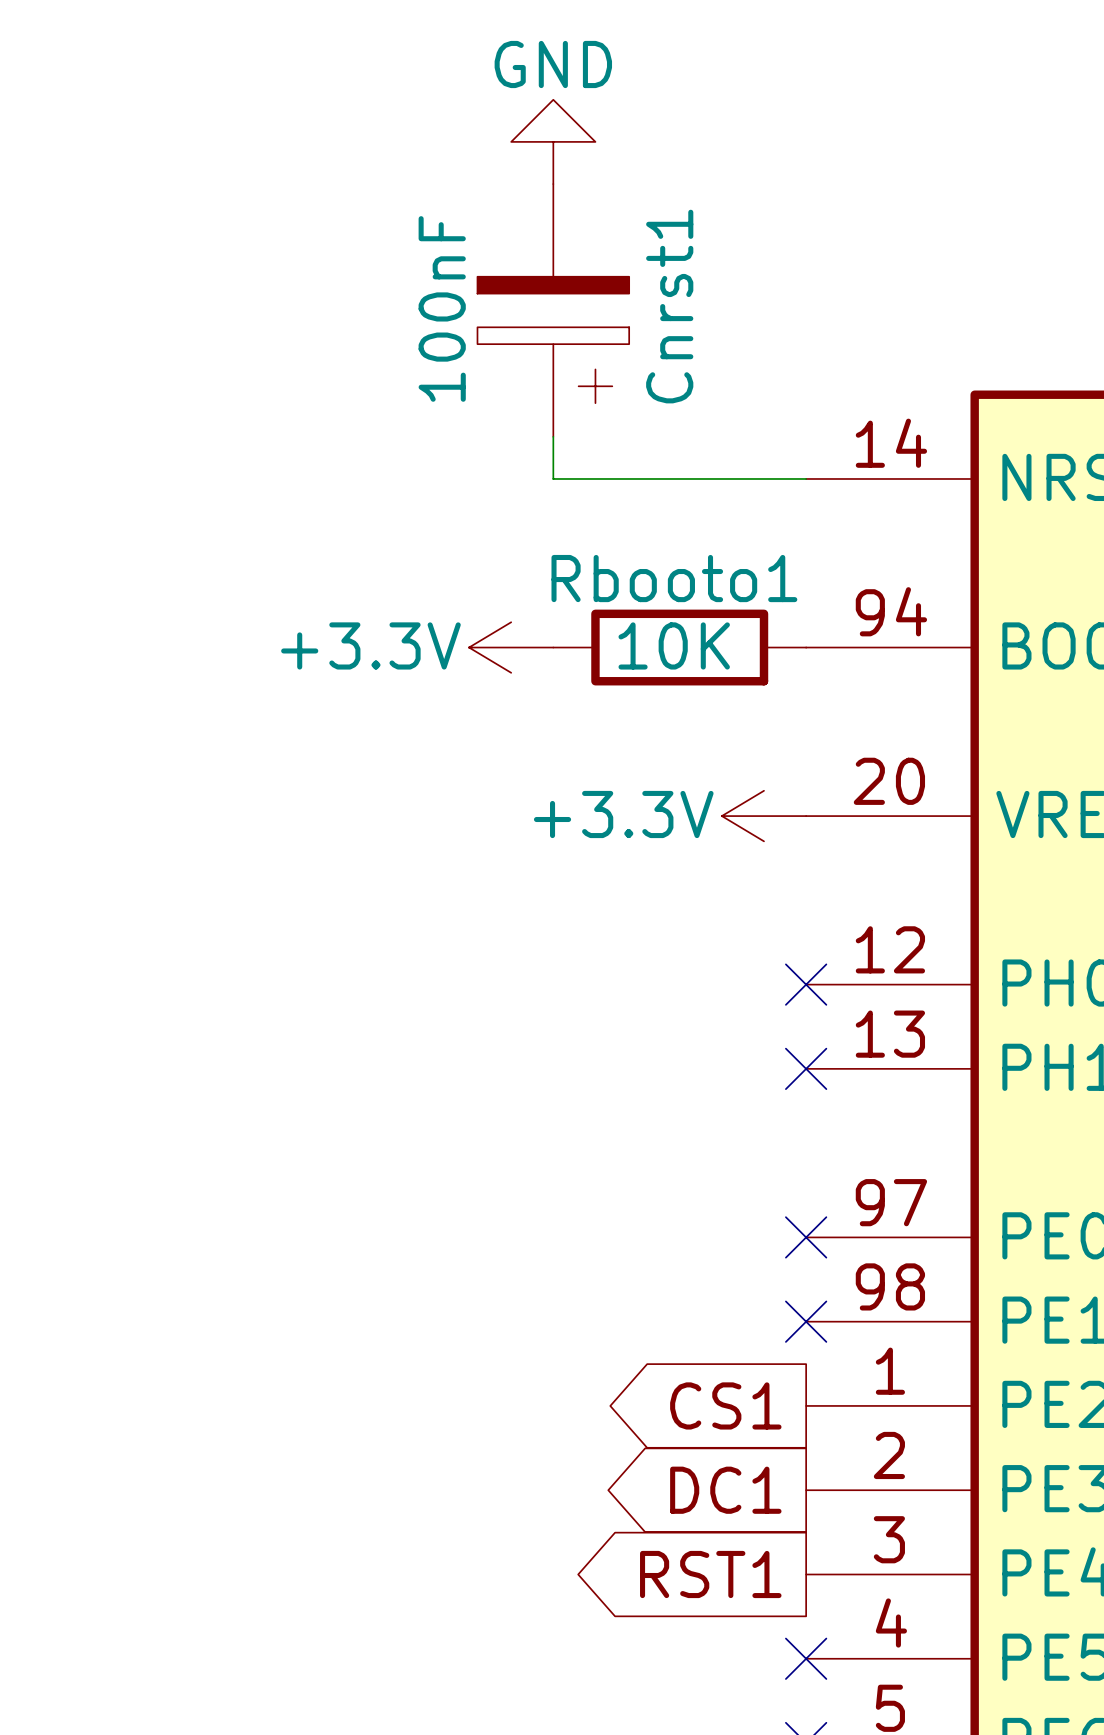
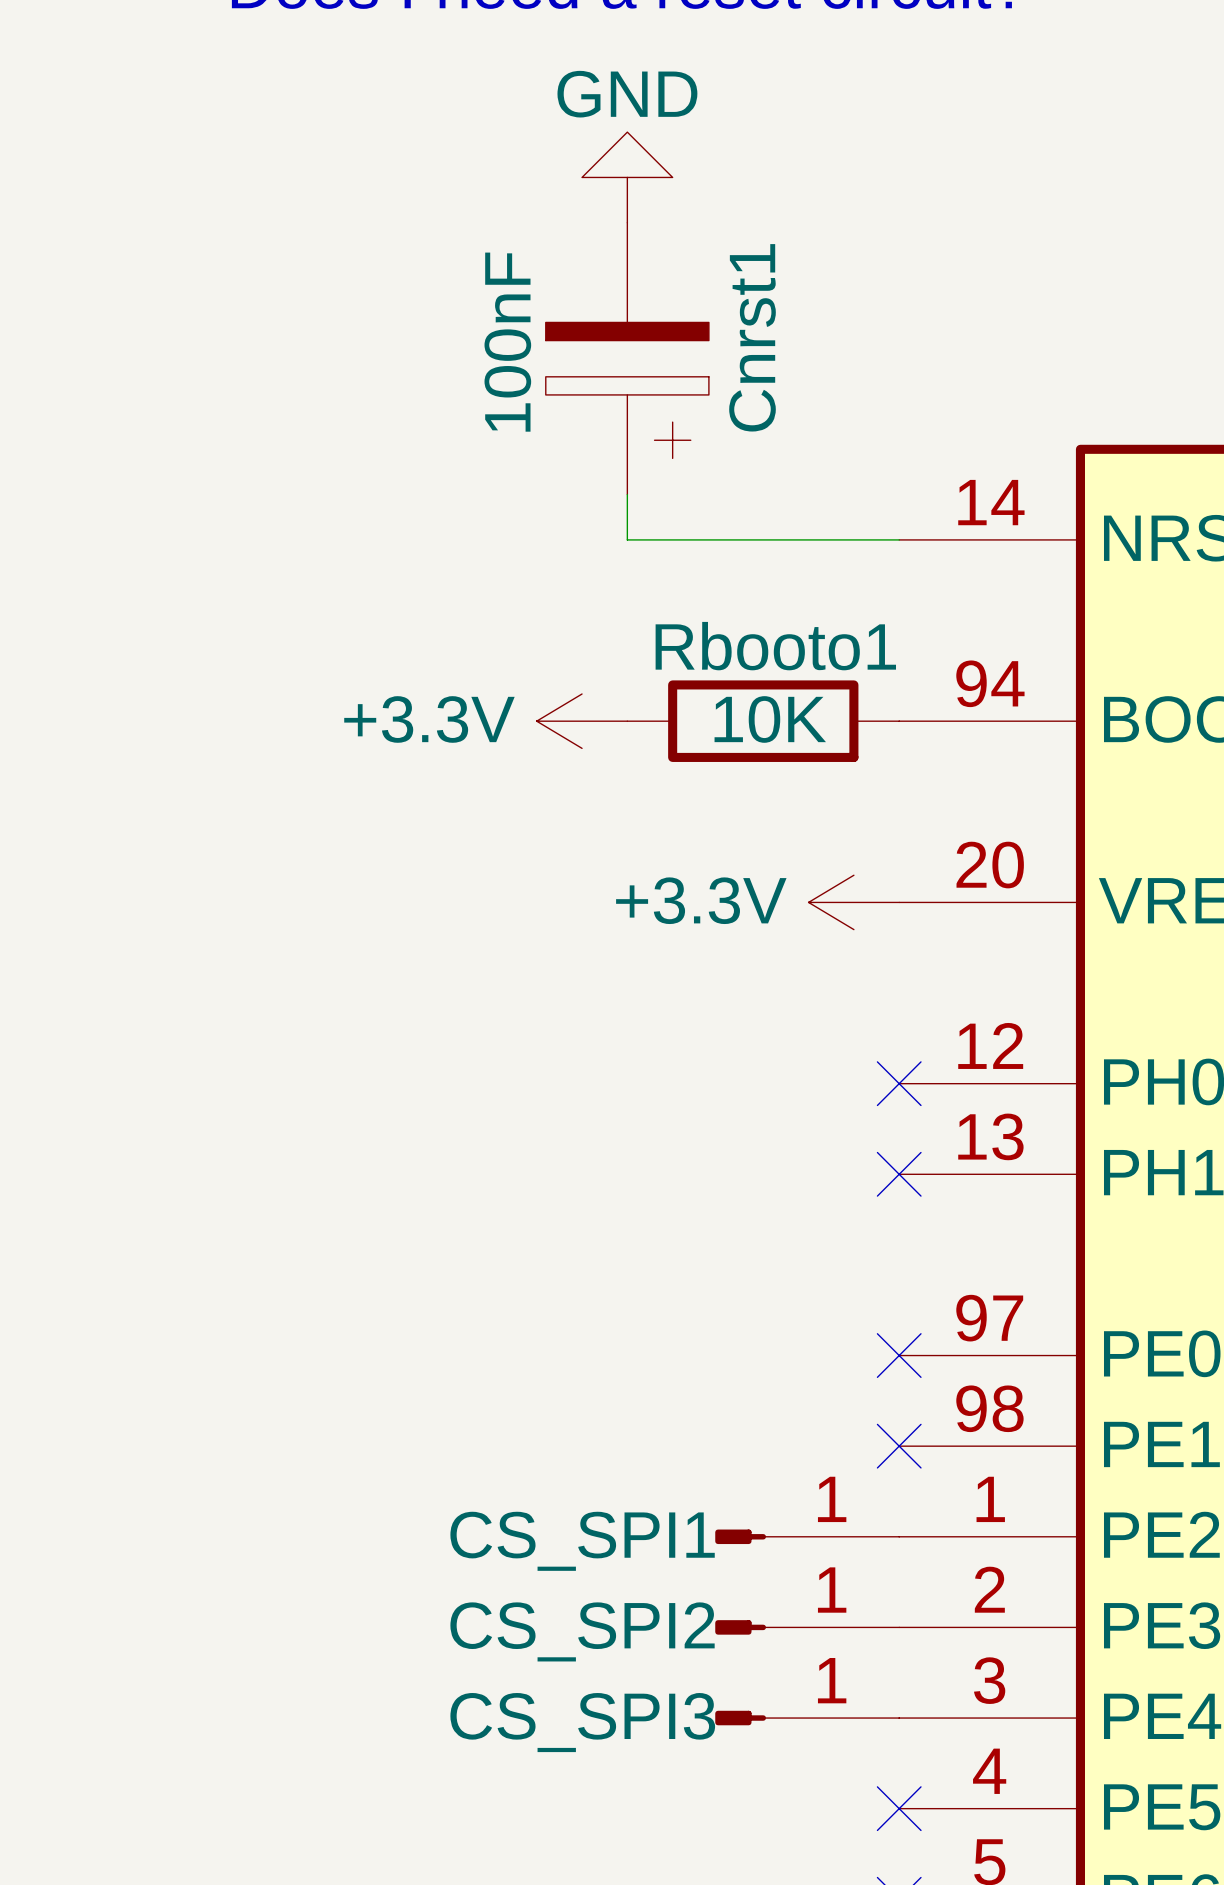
CS_SPI1: none -> (807, 1536)
global label: CS1 (725, 1405) -> none
CS_SPI2: none -> (807, 1627)
global label: DC1 (725, 1490) -> none
global label: RST1 (710, 1574) -> none
CS_SPI3: none -> (807, 1718)

